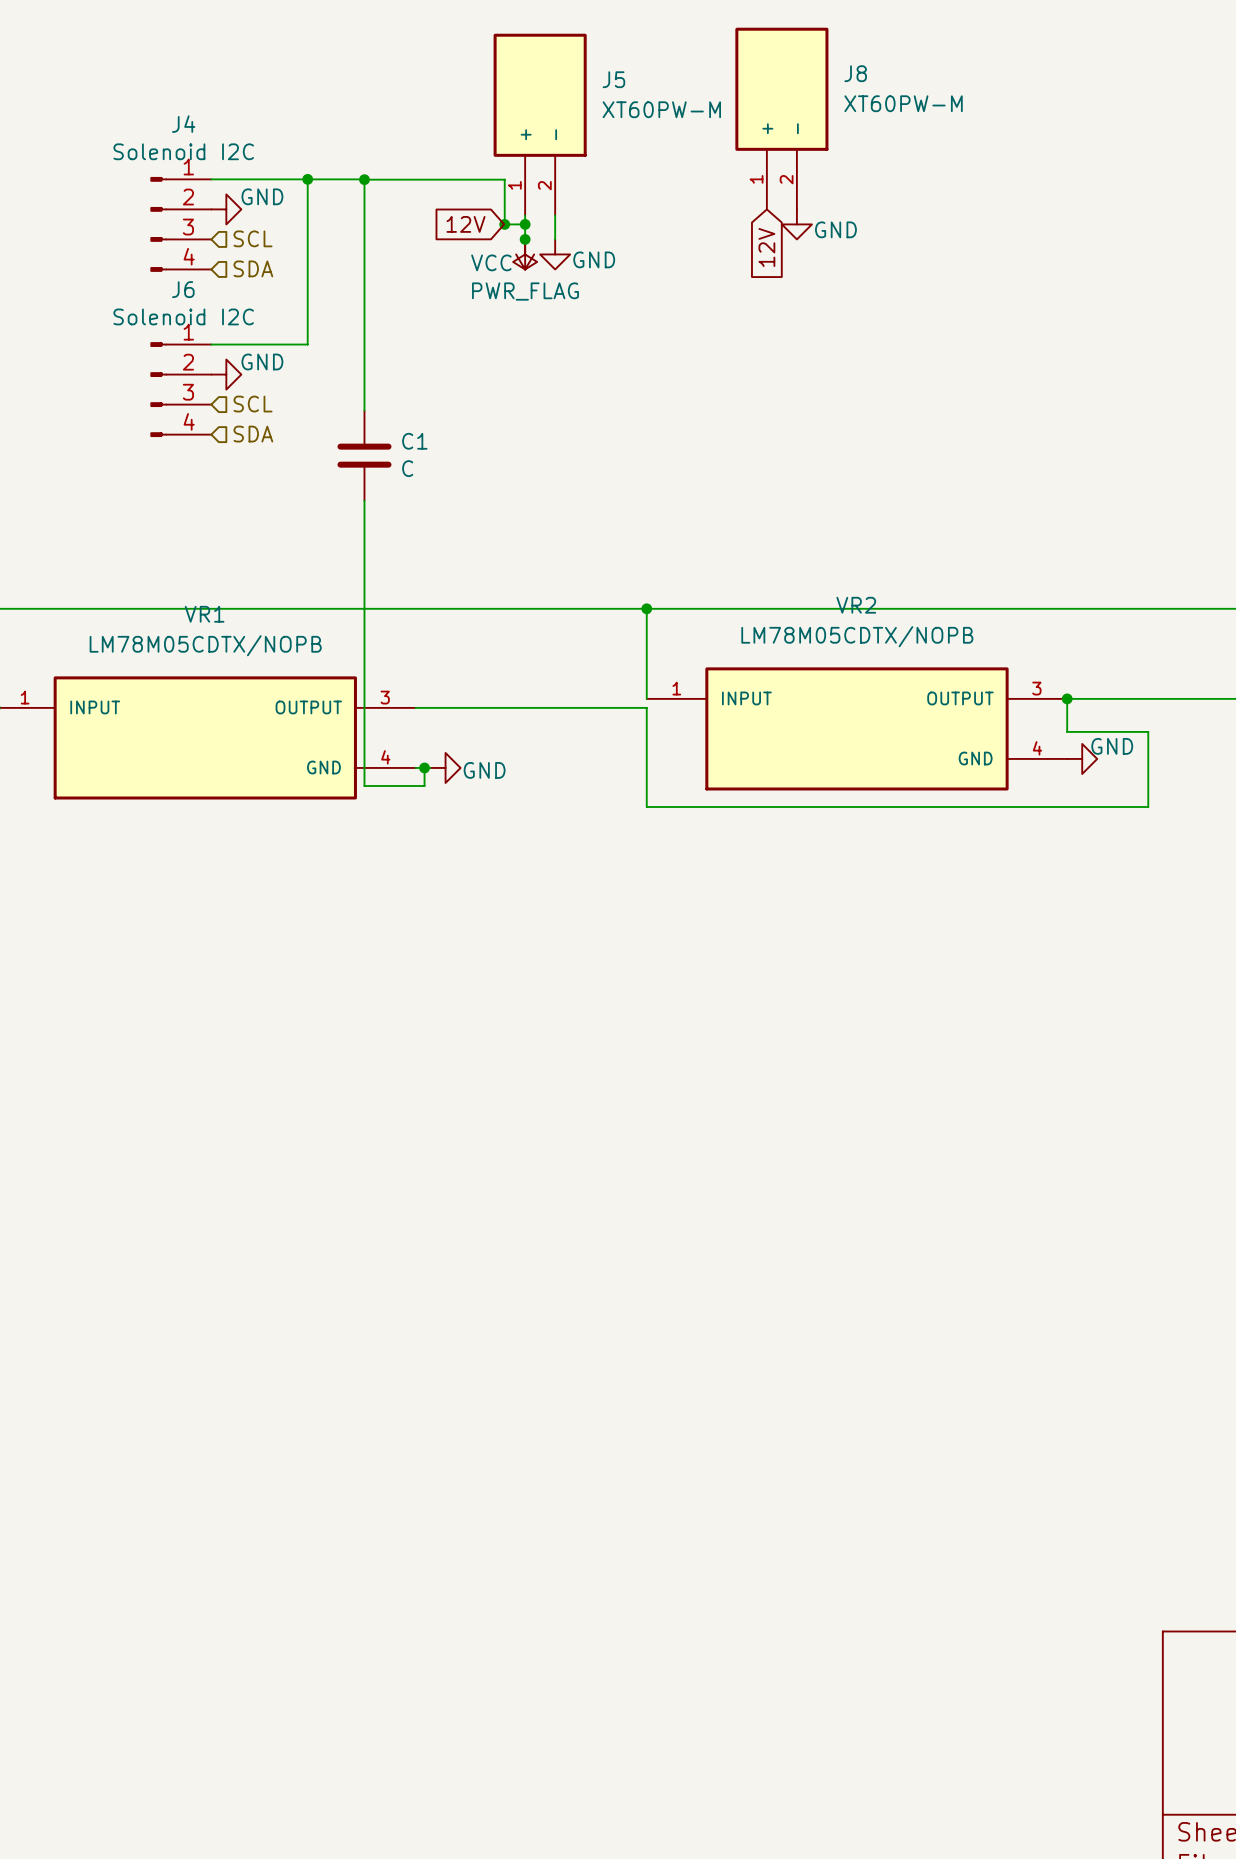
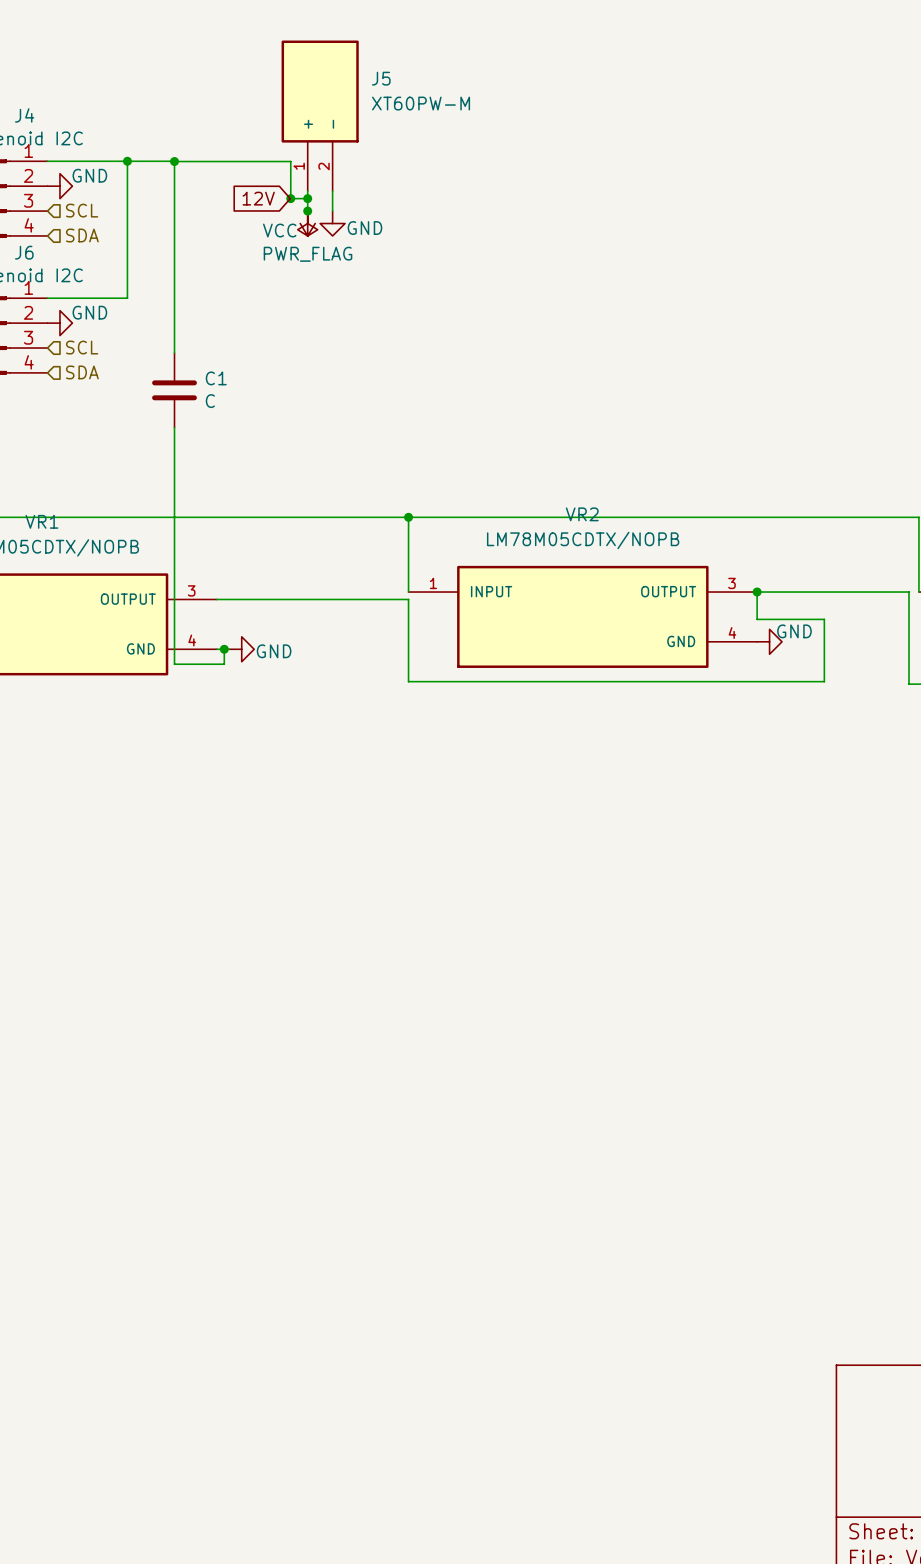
J8: XT60PW-M (781, 118) -> none
power symbol: GND (796, 224) -> none
global label: 12V (766, 247) -> none

